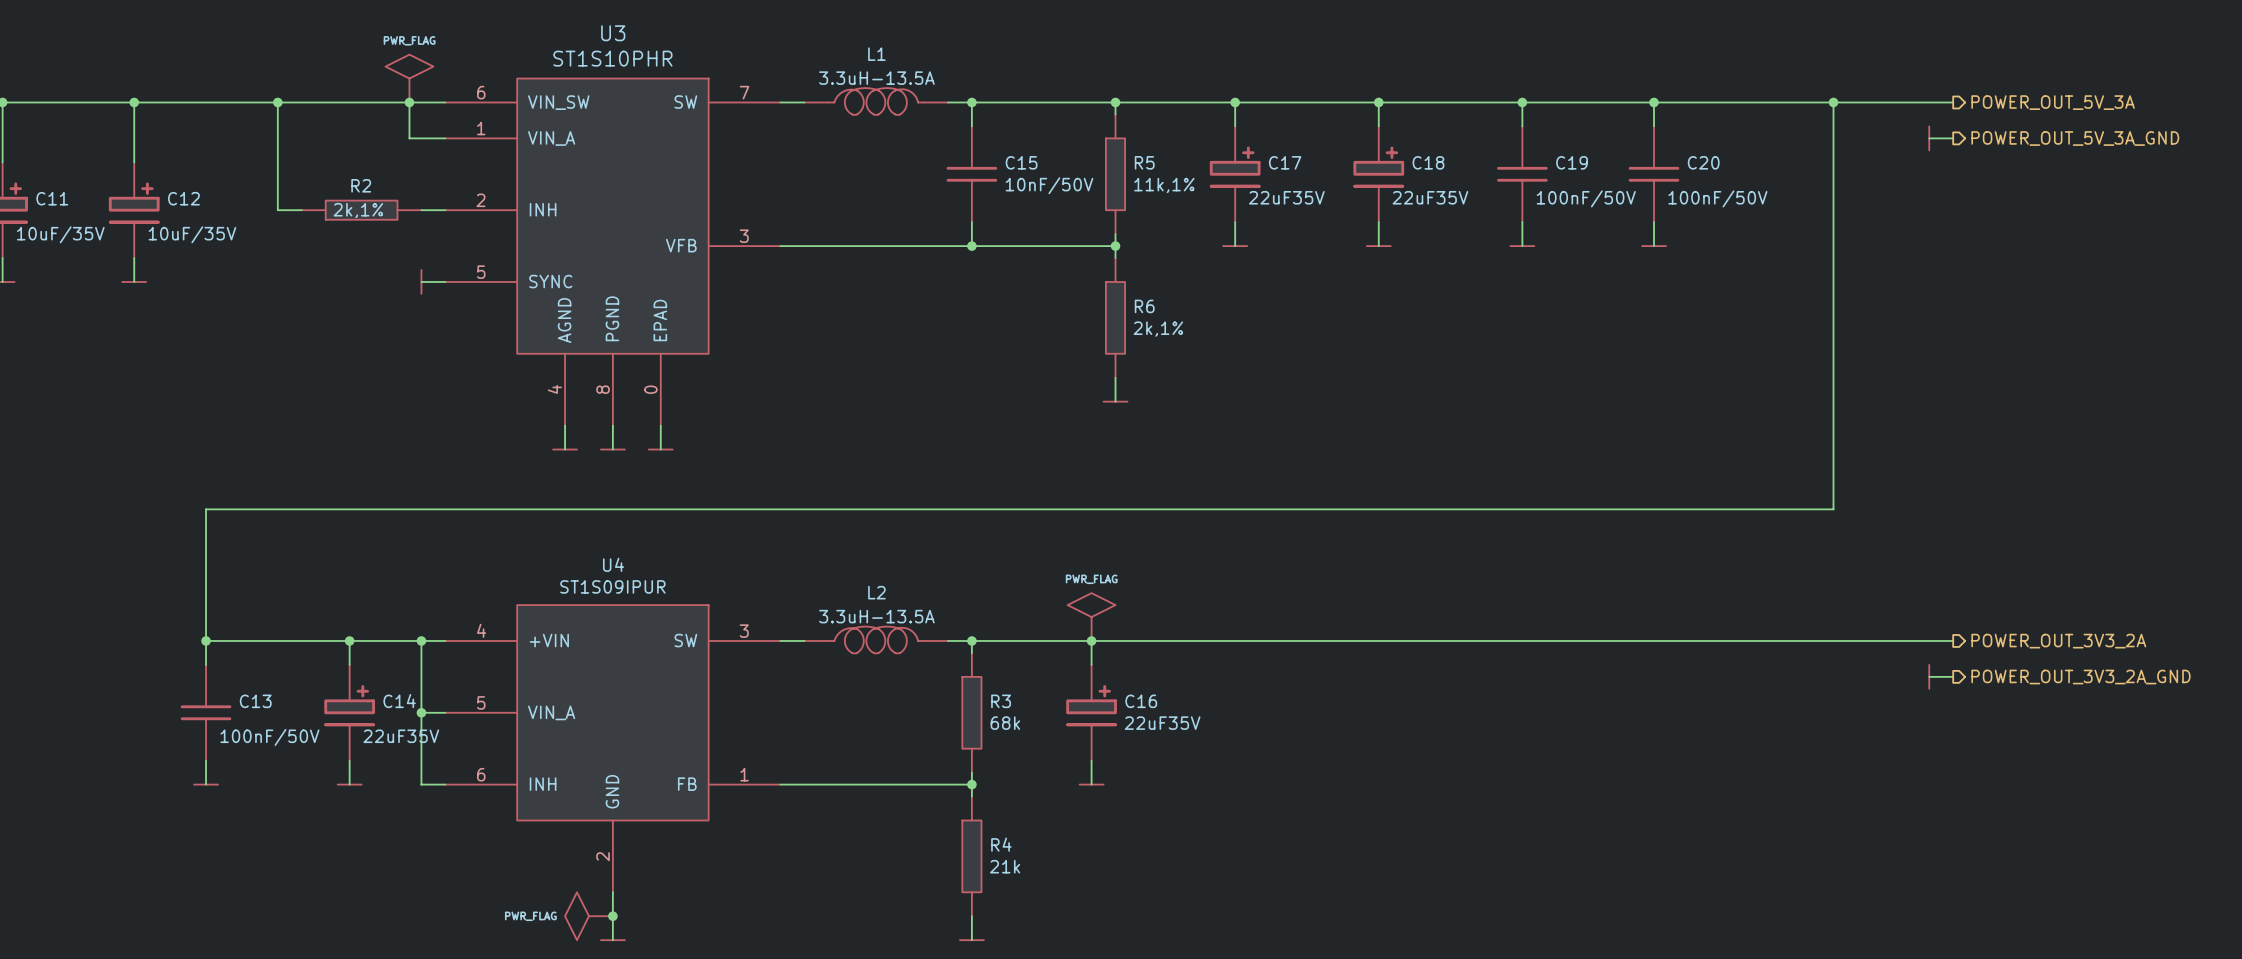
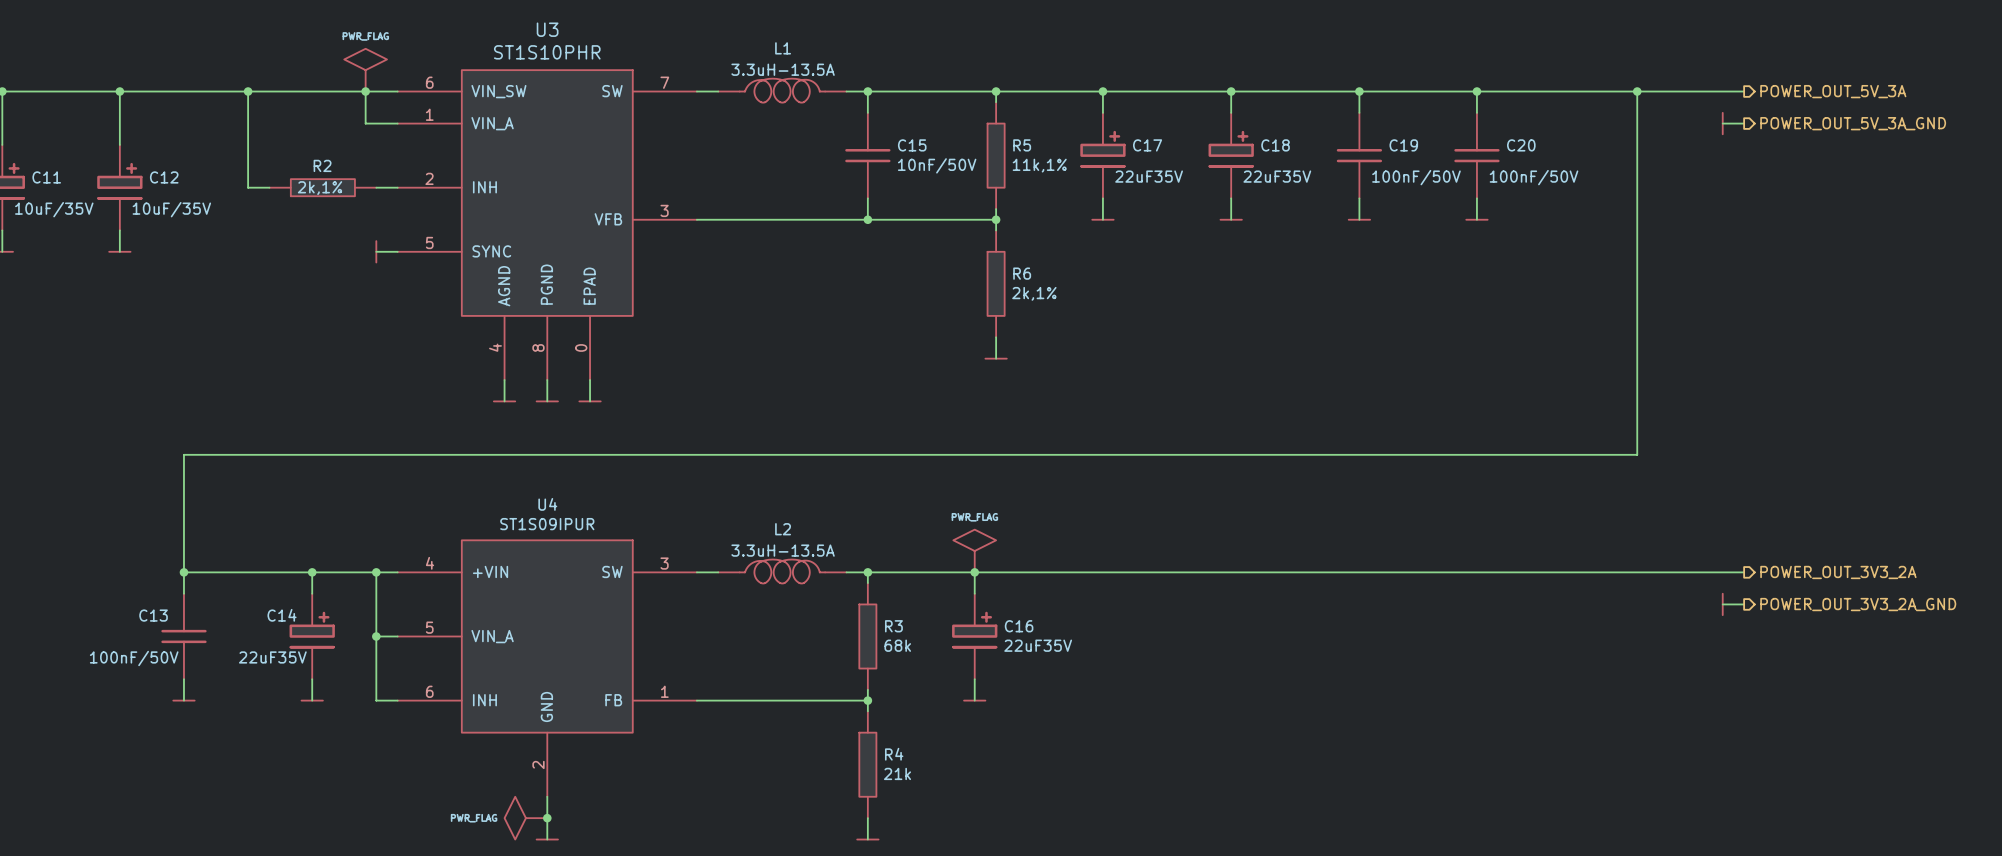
C13 name position: C13 (255, 701) -> C13 (153, 615)
C14 name position: C14 (399, 701) -> C14 (282, 615)
C14 value position: 22uF35V (401, 736) -> 22uF35V (272, 657)
C13 value position: 100nF/50V (269, 737) -> 100nF/50V (134, 658)

